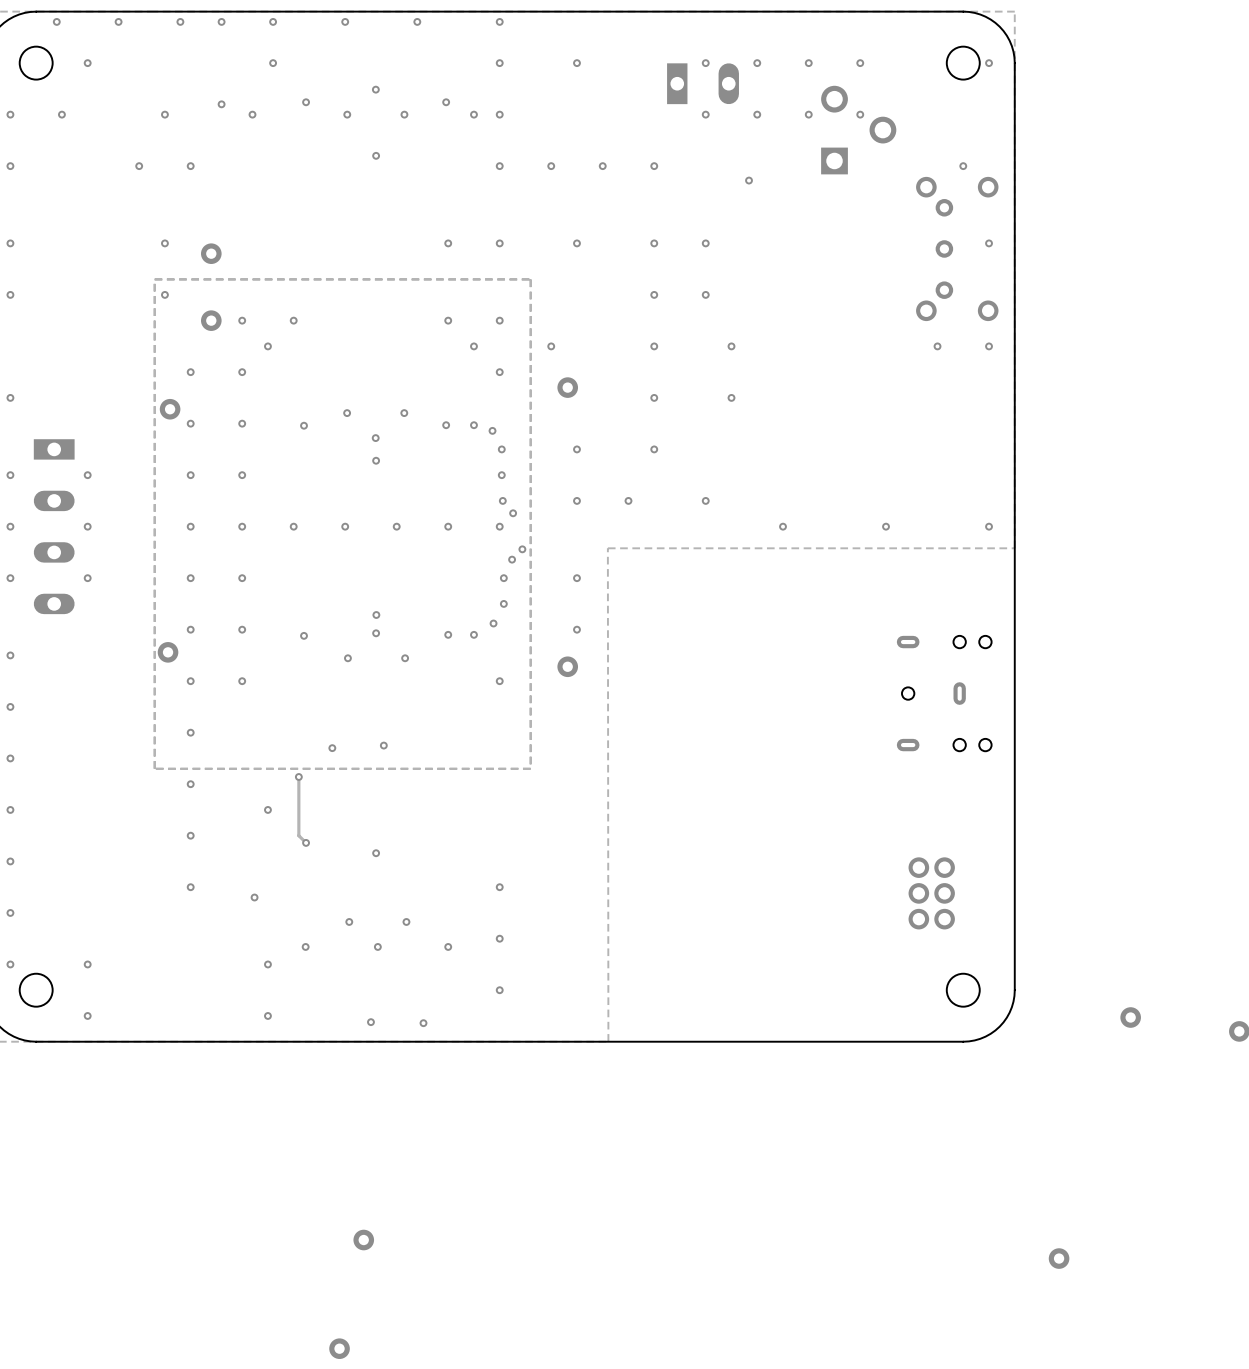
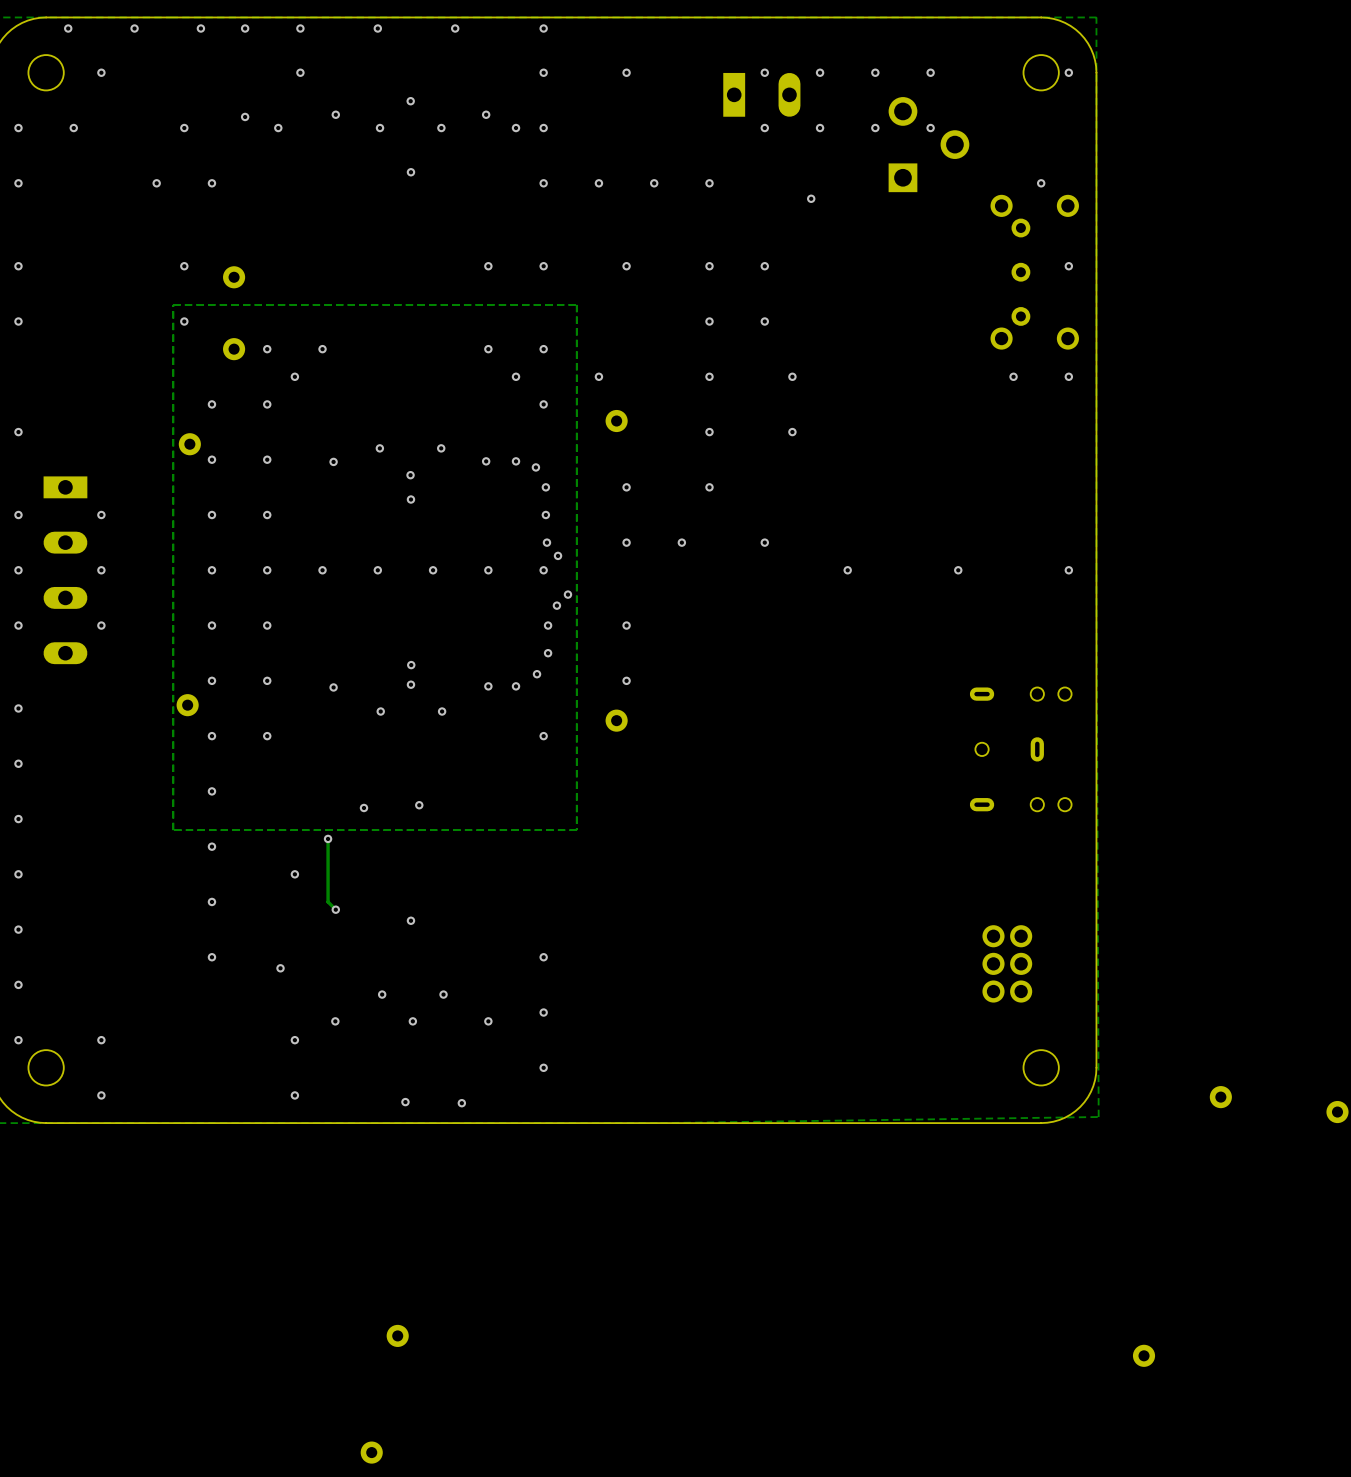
zone outline: (1014, 548) (607, 548) (608, 1041) -> (1096, 593) (1098, 1117) (660, 1123)

